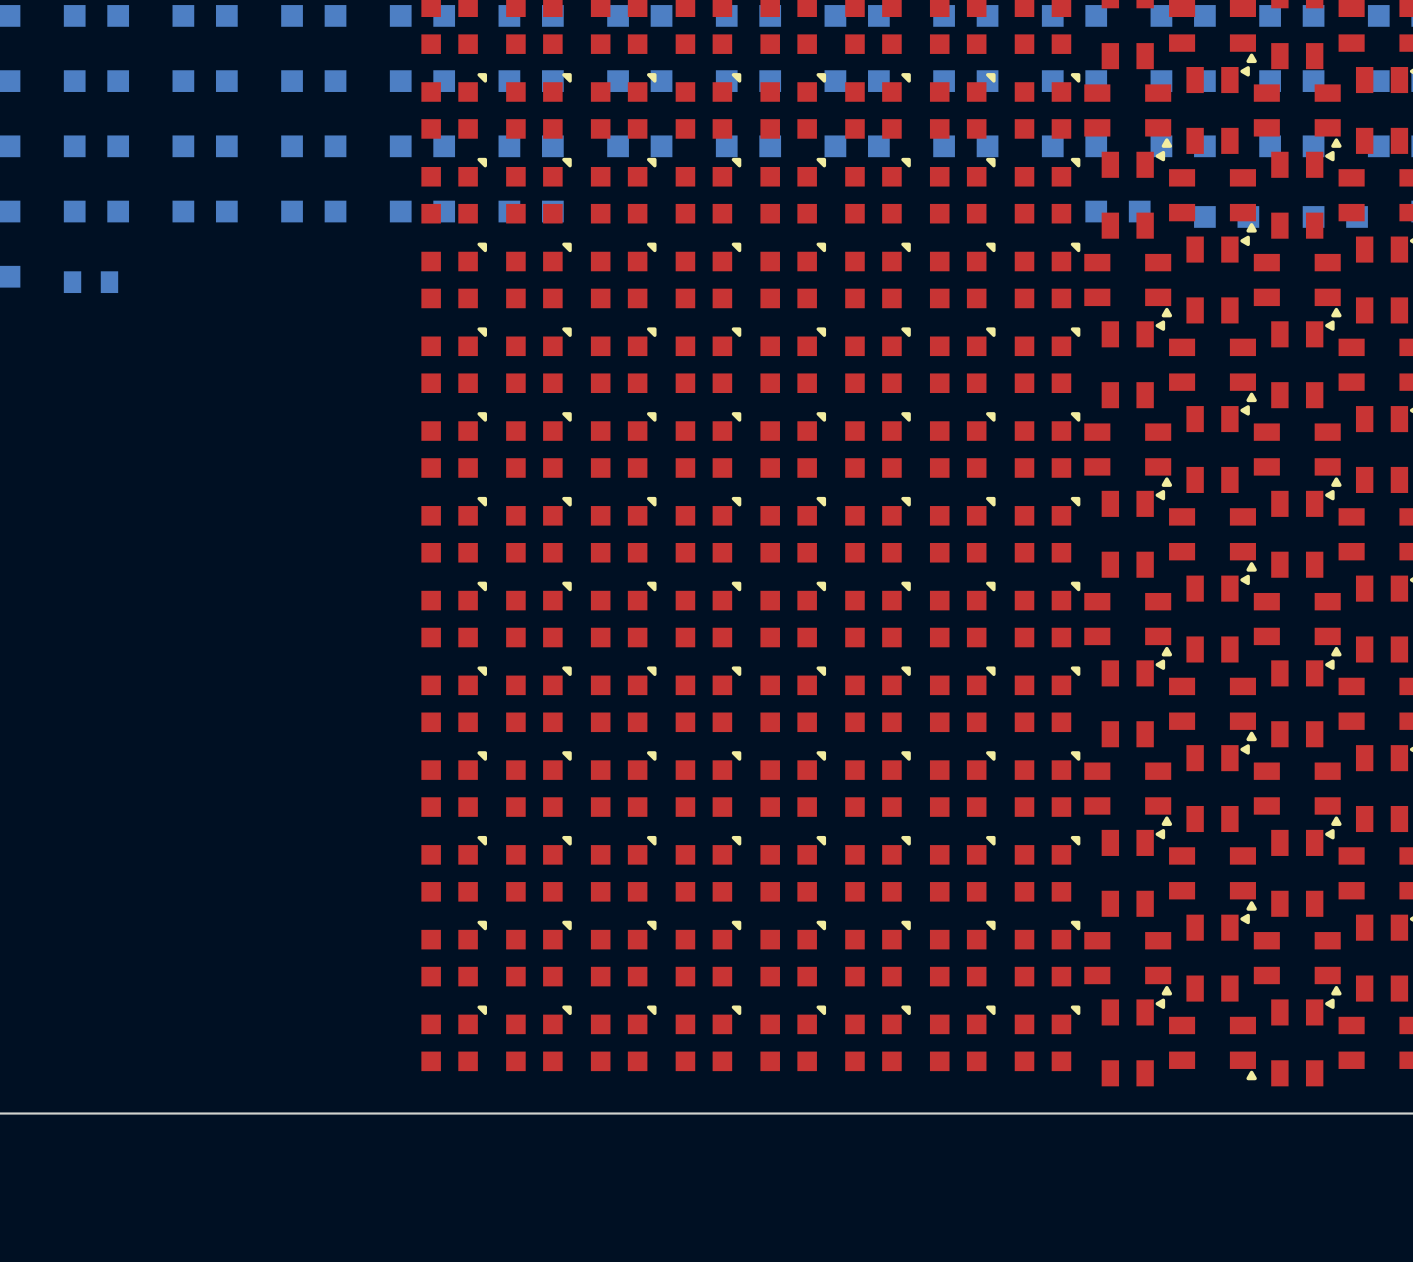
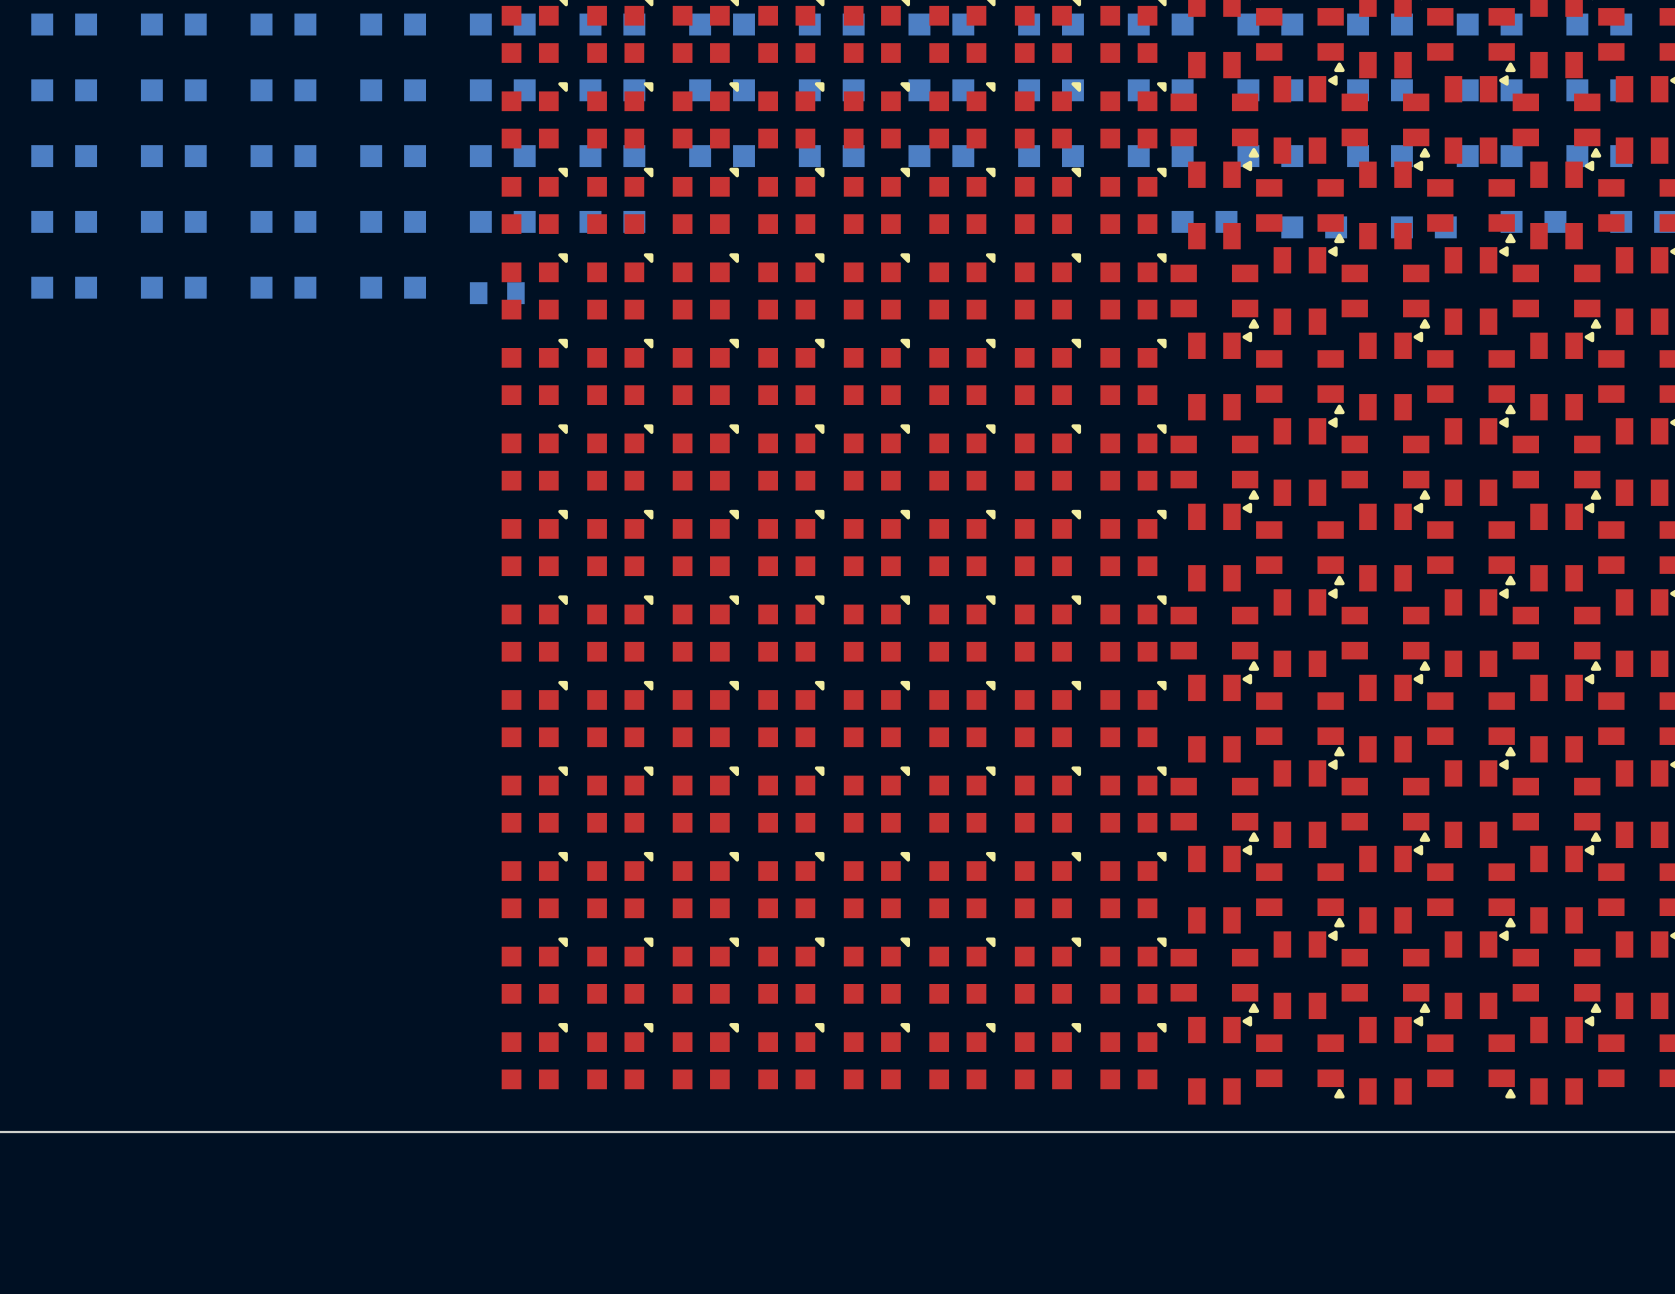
part footprint: [63, 271, 119, 294] -> [140, 276, 207, 299]
part: none -> (283, 287)
part: none -> (393, 287)
part: none -> (497, 293)

